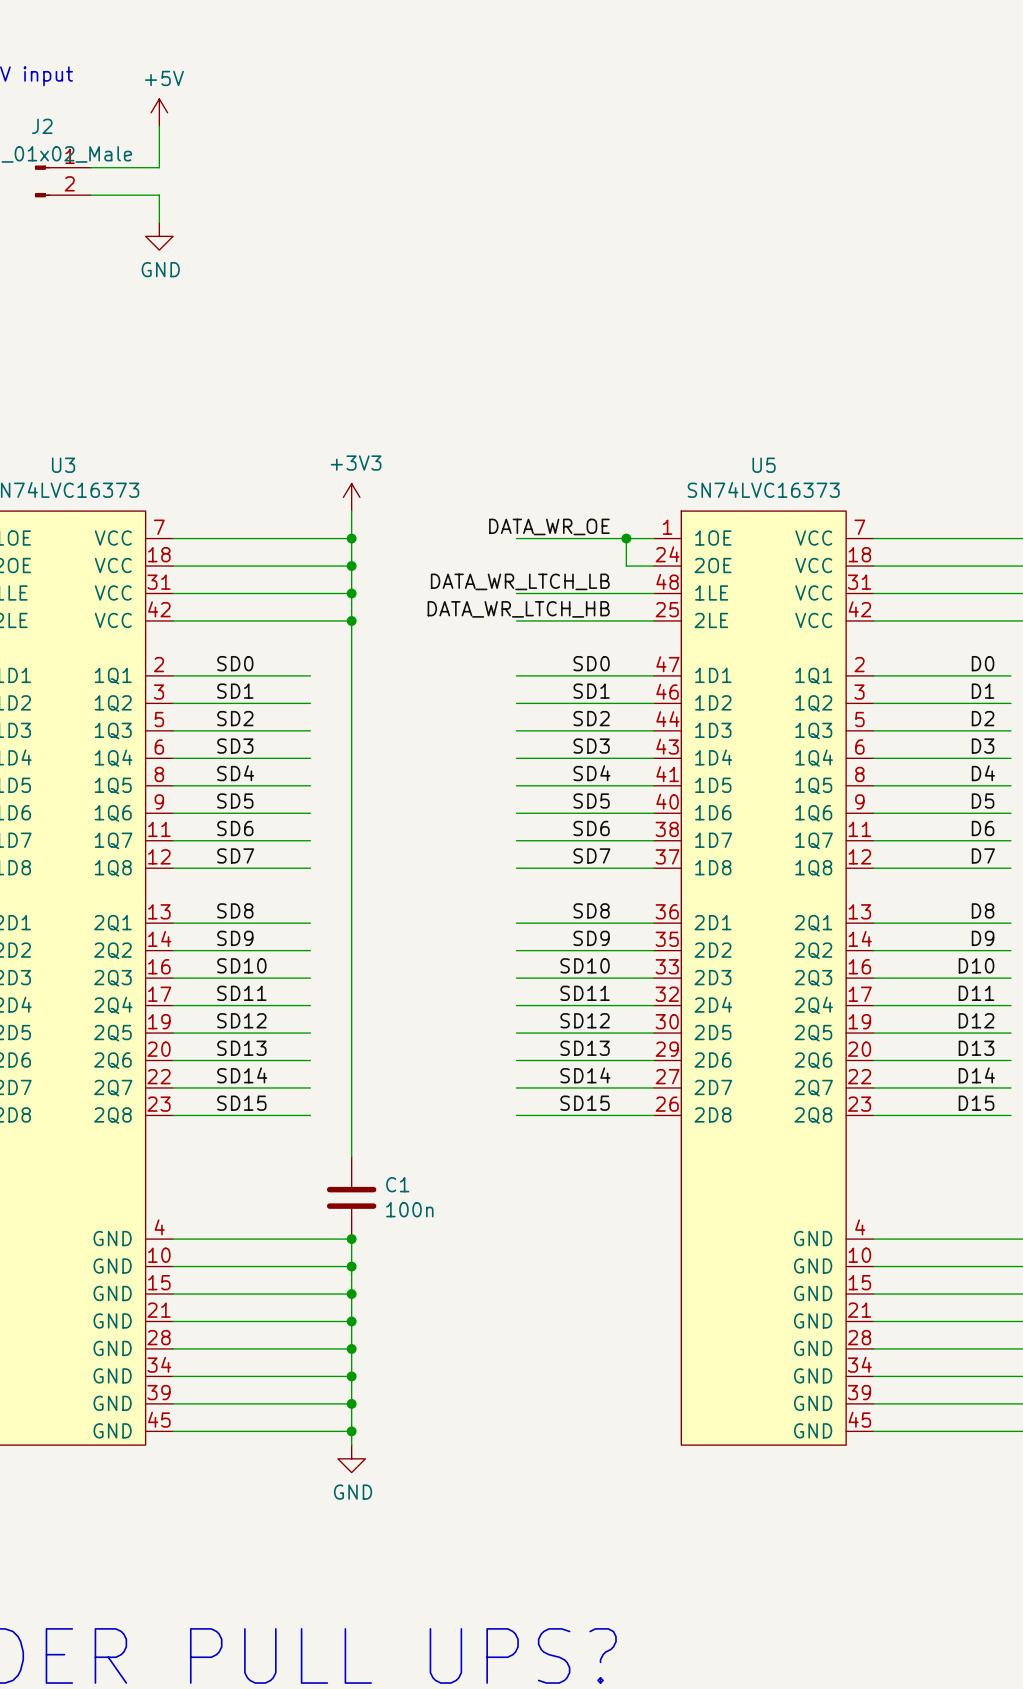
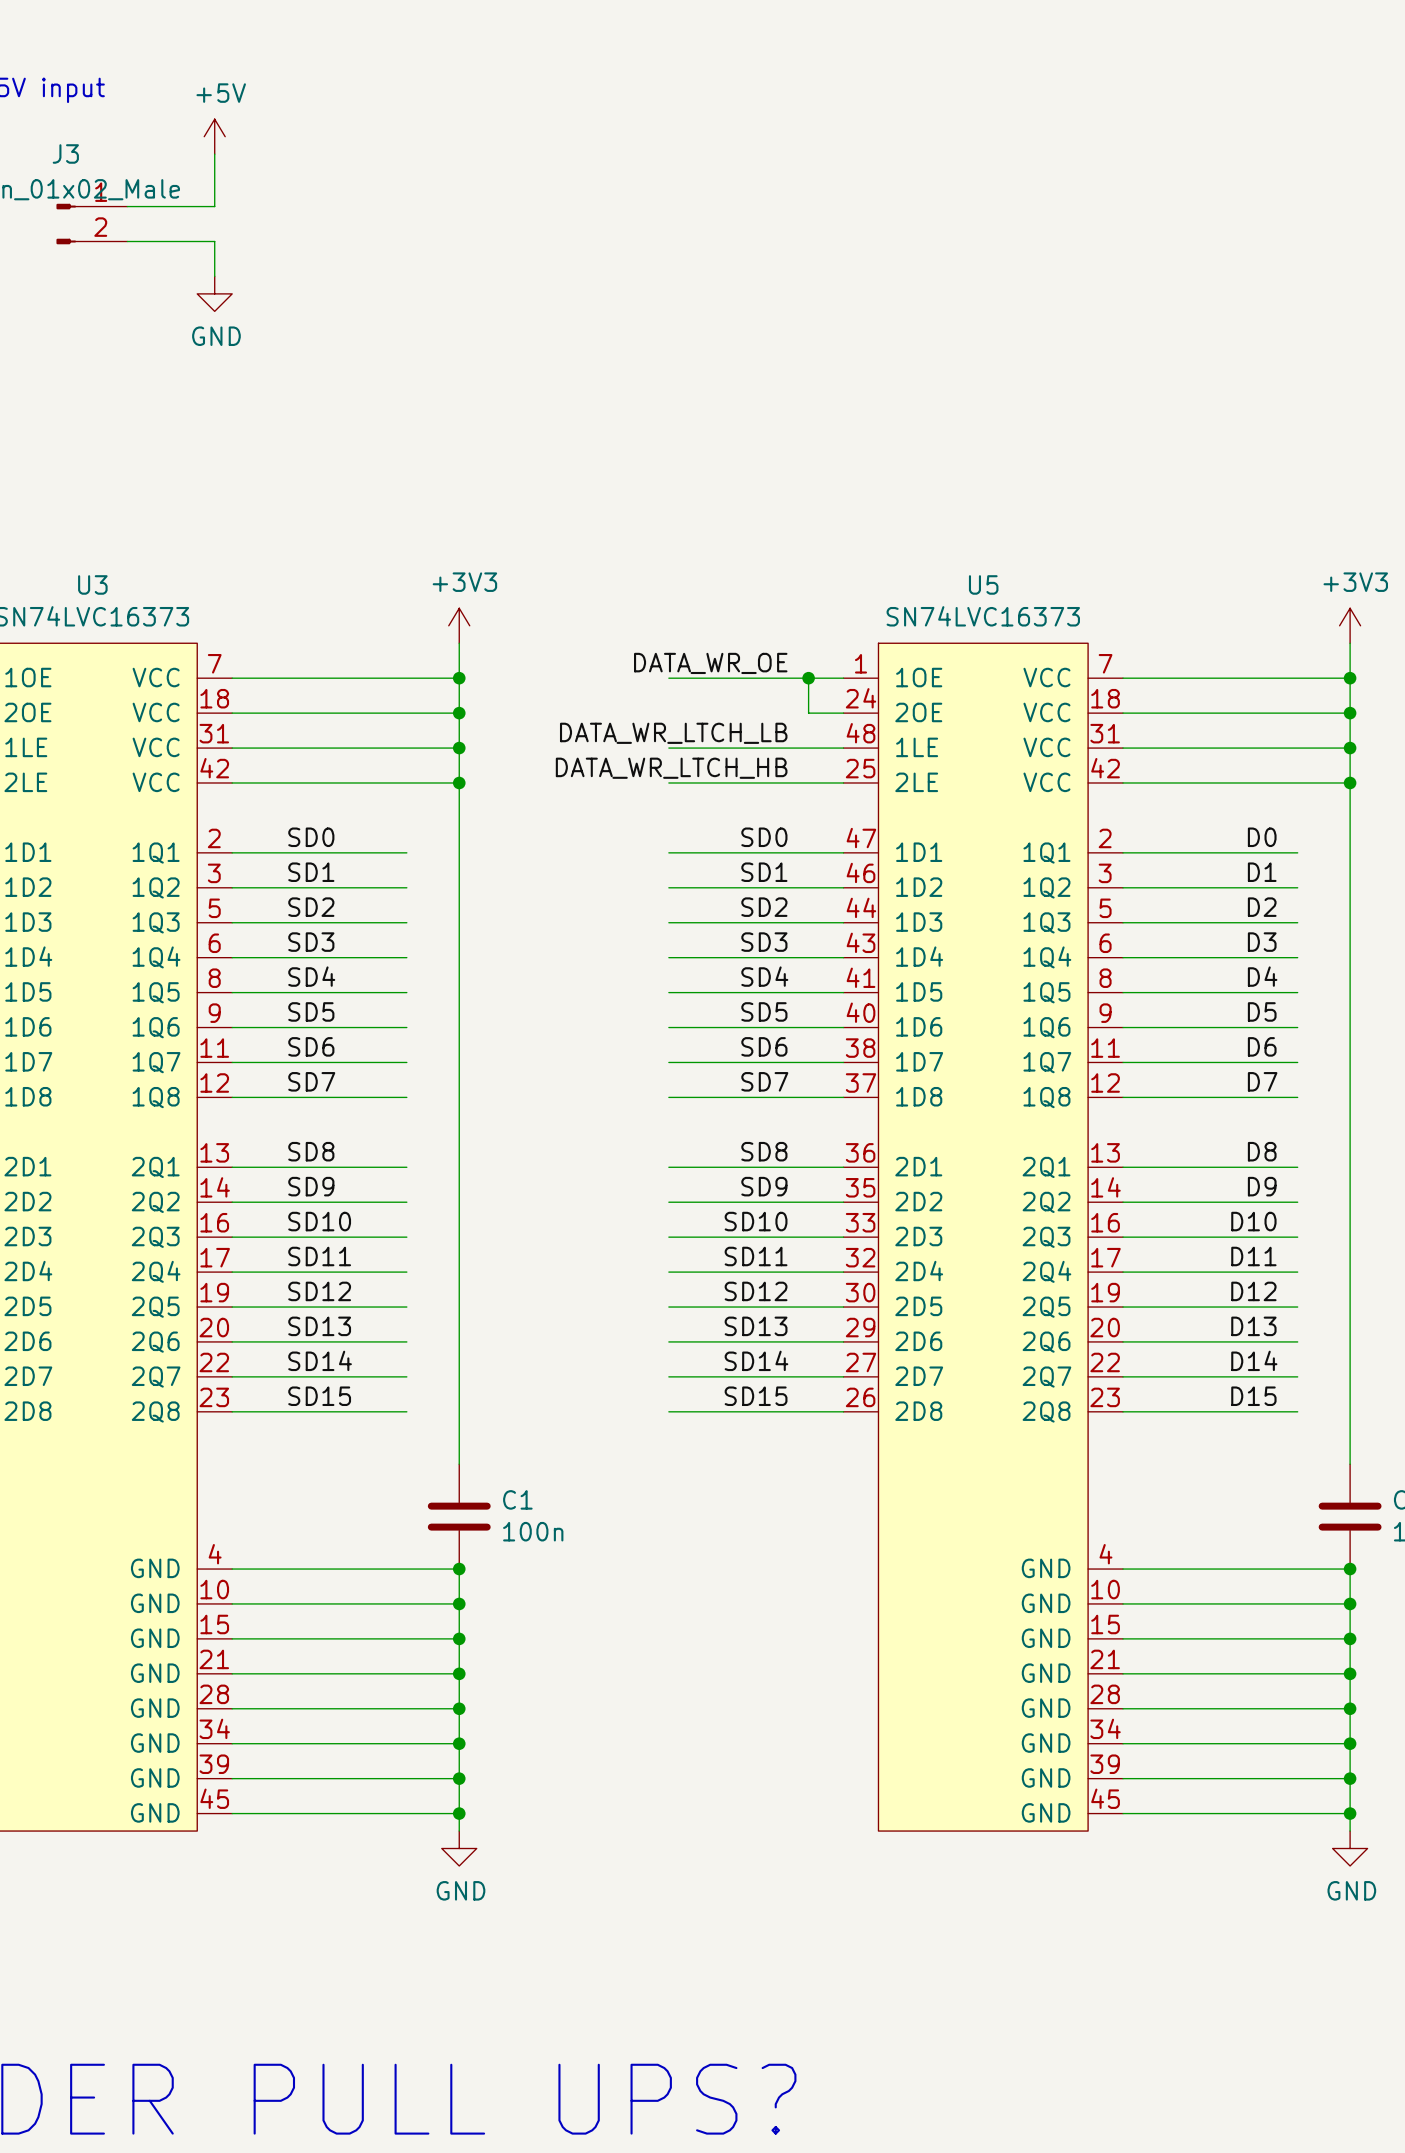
J2 name: J2 (42, 126) -> J3 (65, 153)

